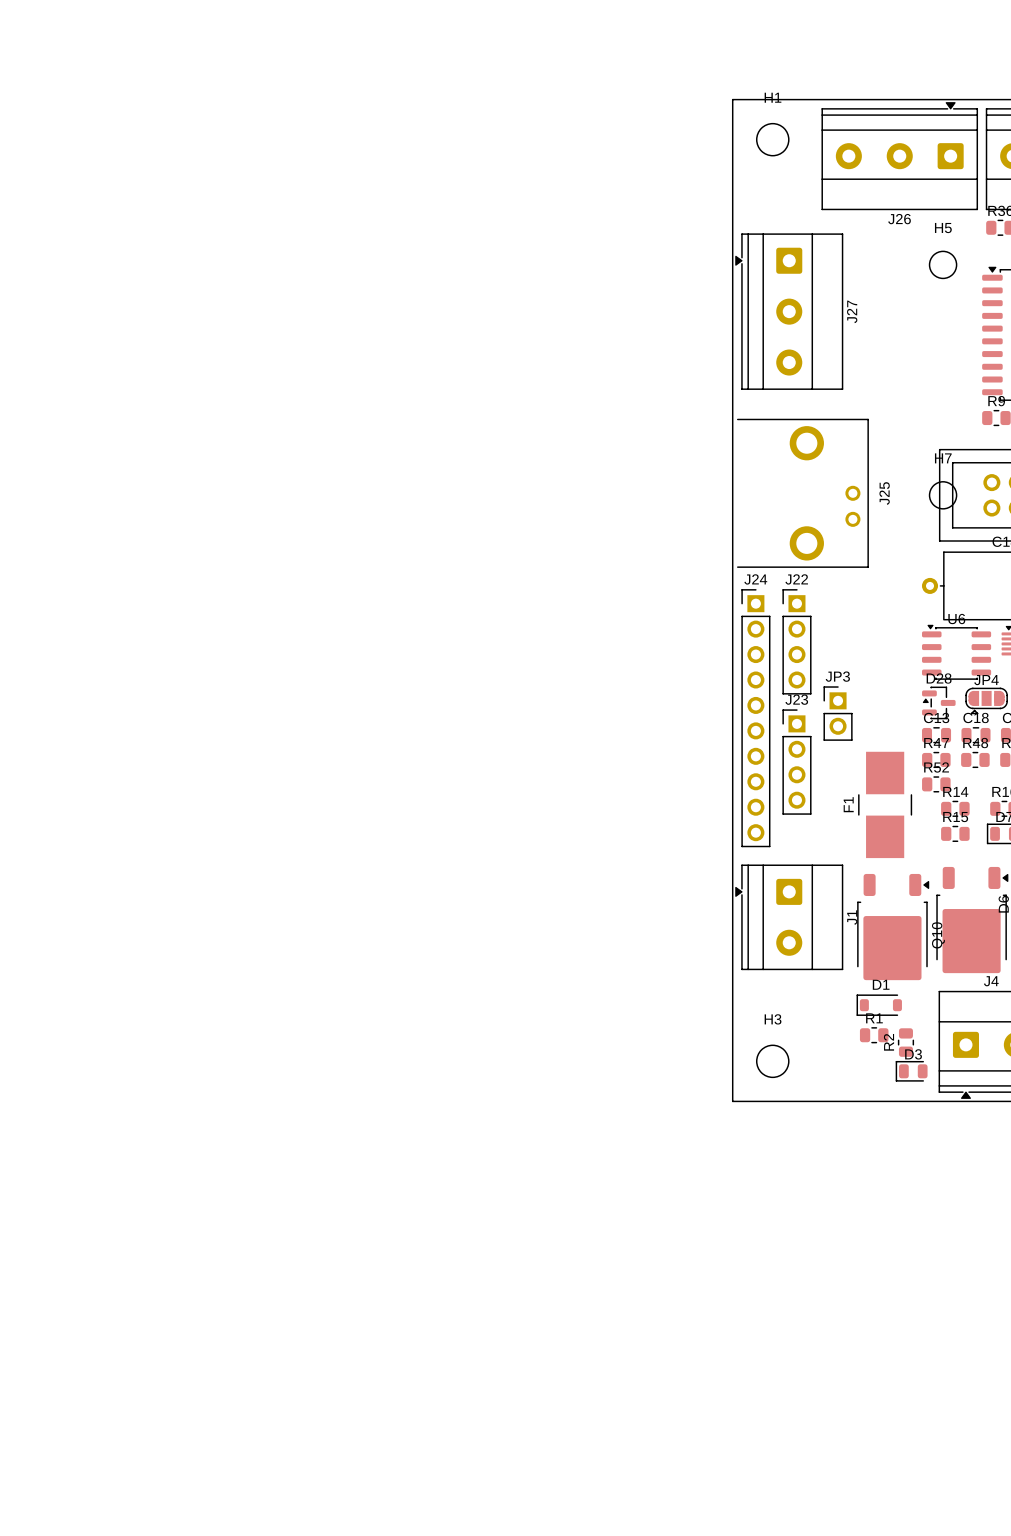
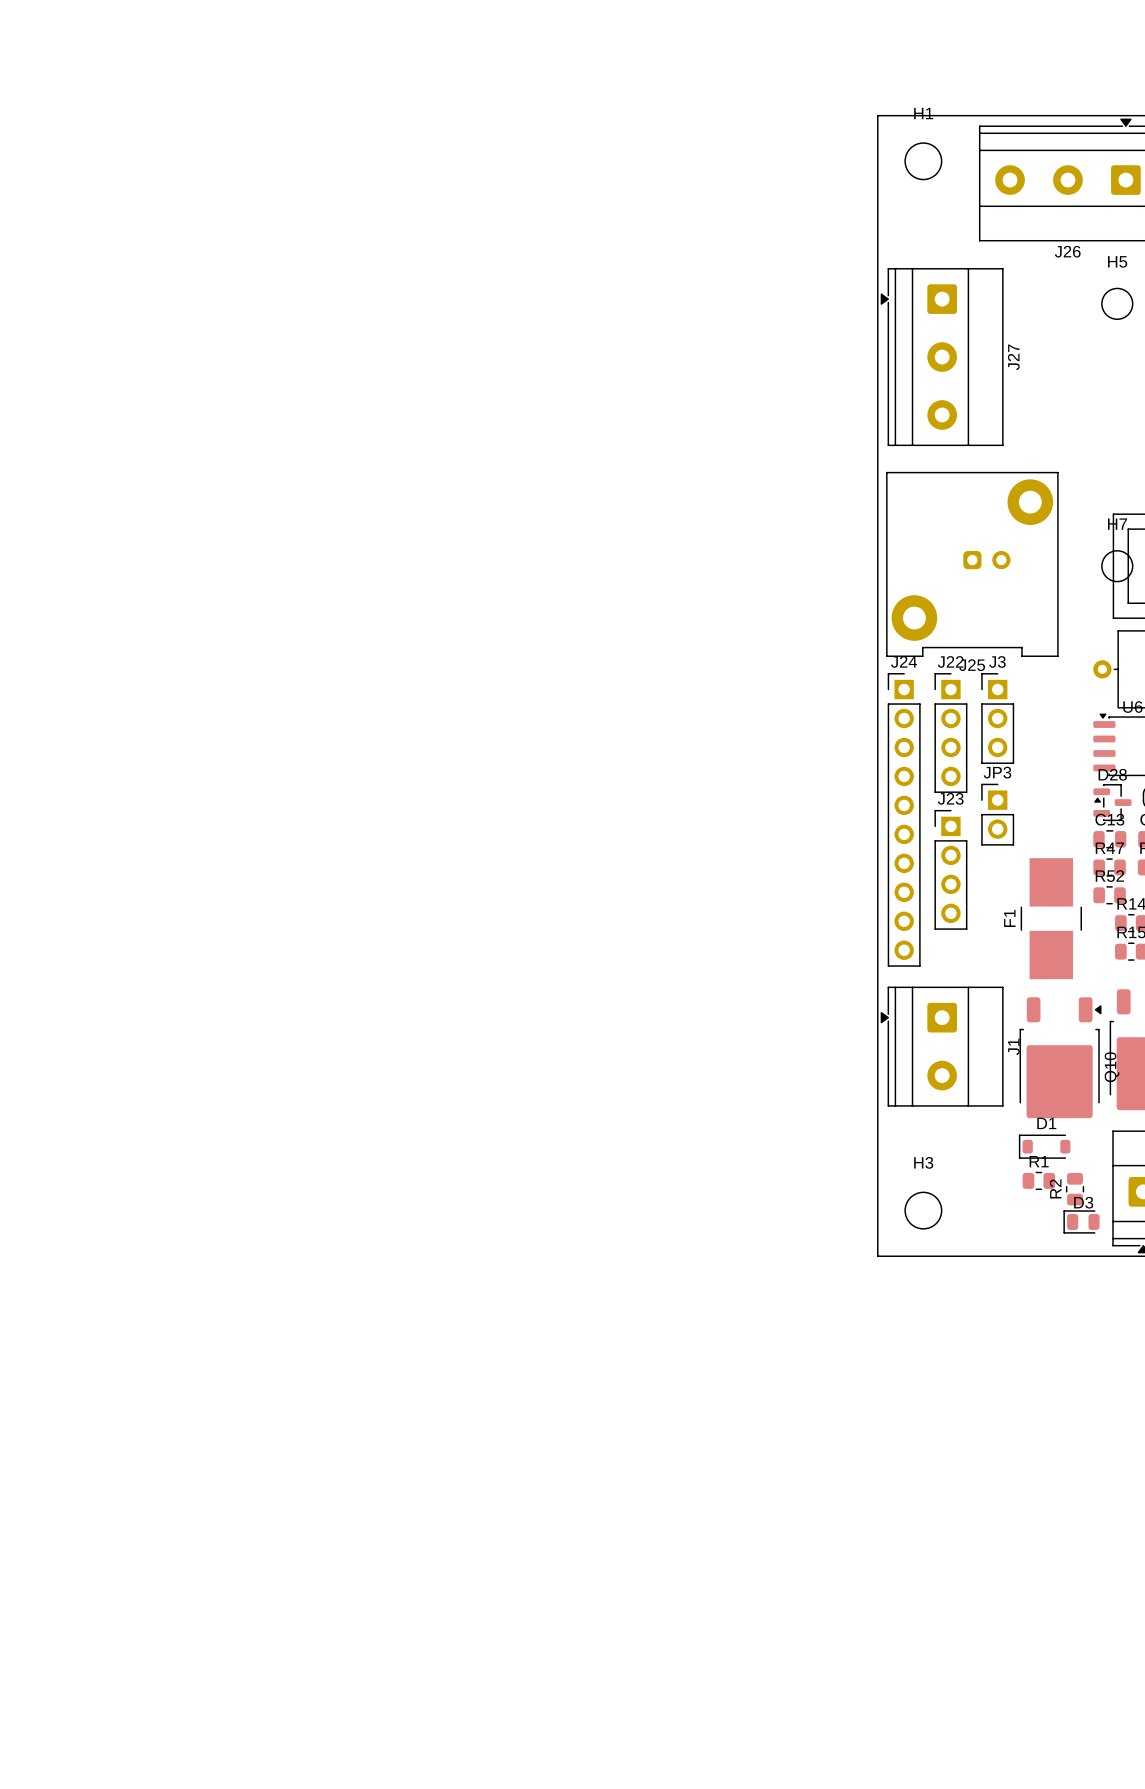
J25 footprint: [737, 418, 869, 568] -> [886, 471, 1059, 657]
J25 name position: J25 (884, 493) -> J25 (972, 665)
J3: none -> (997, 718)

